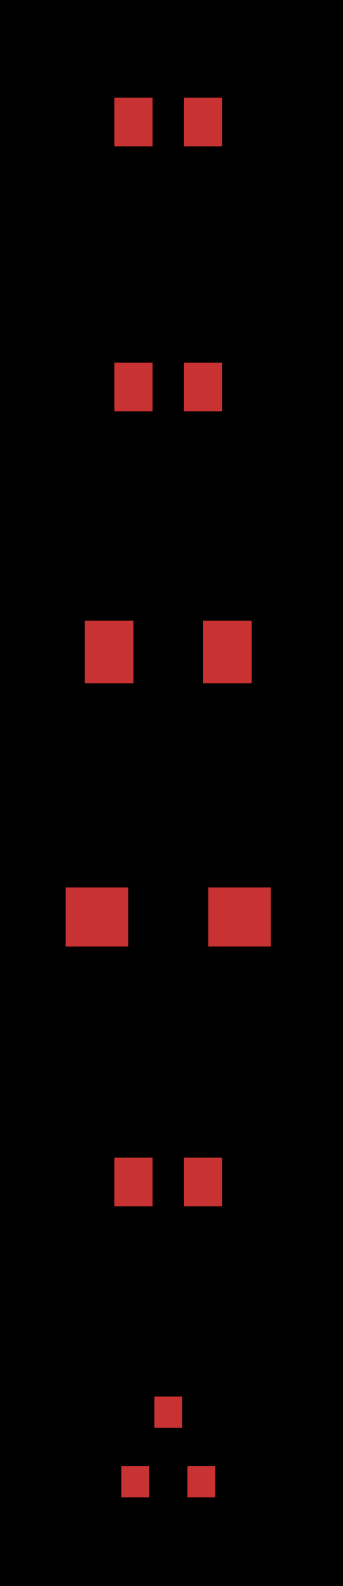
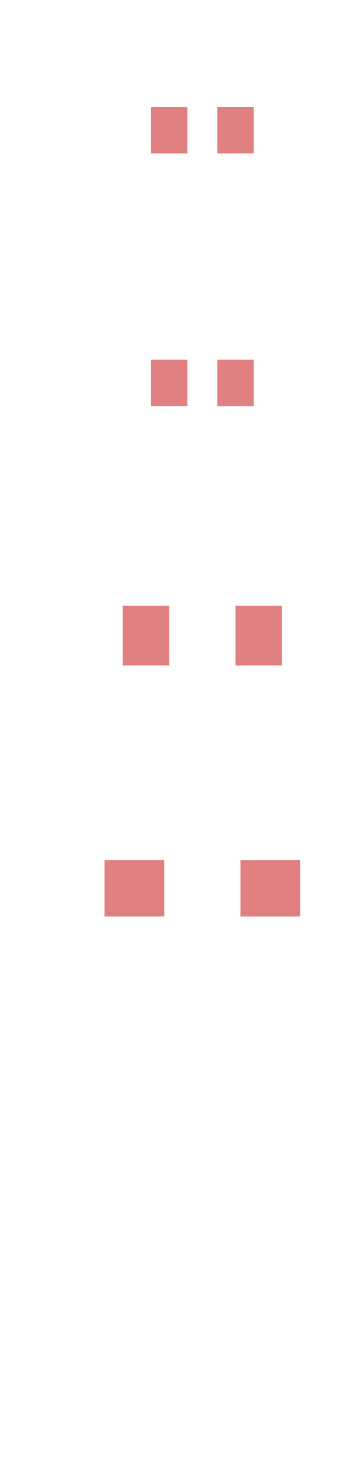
part: (168, 1181) -> none
part: (168, 1446) -> none

